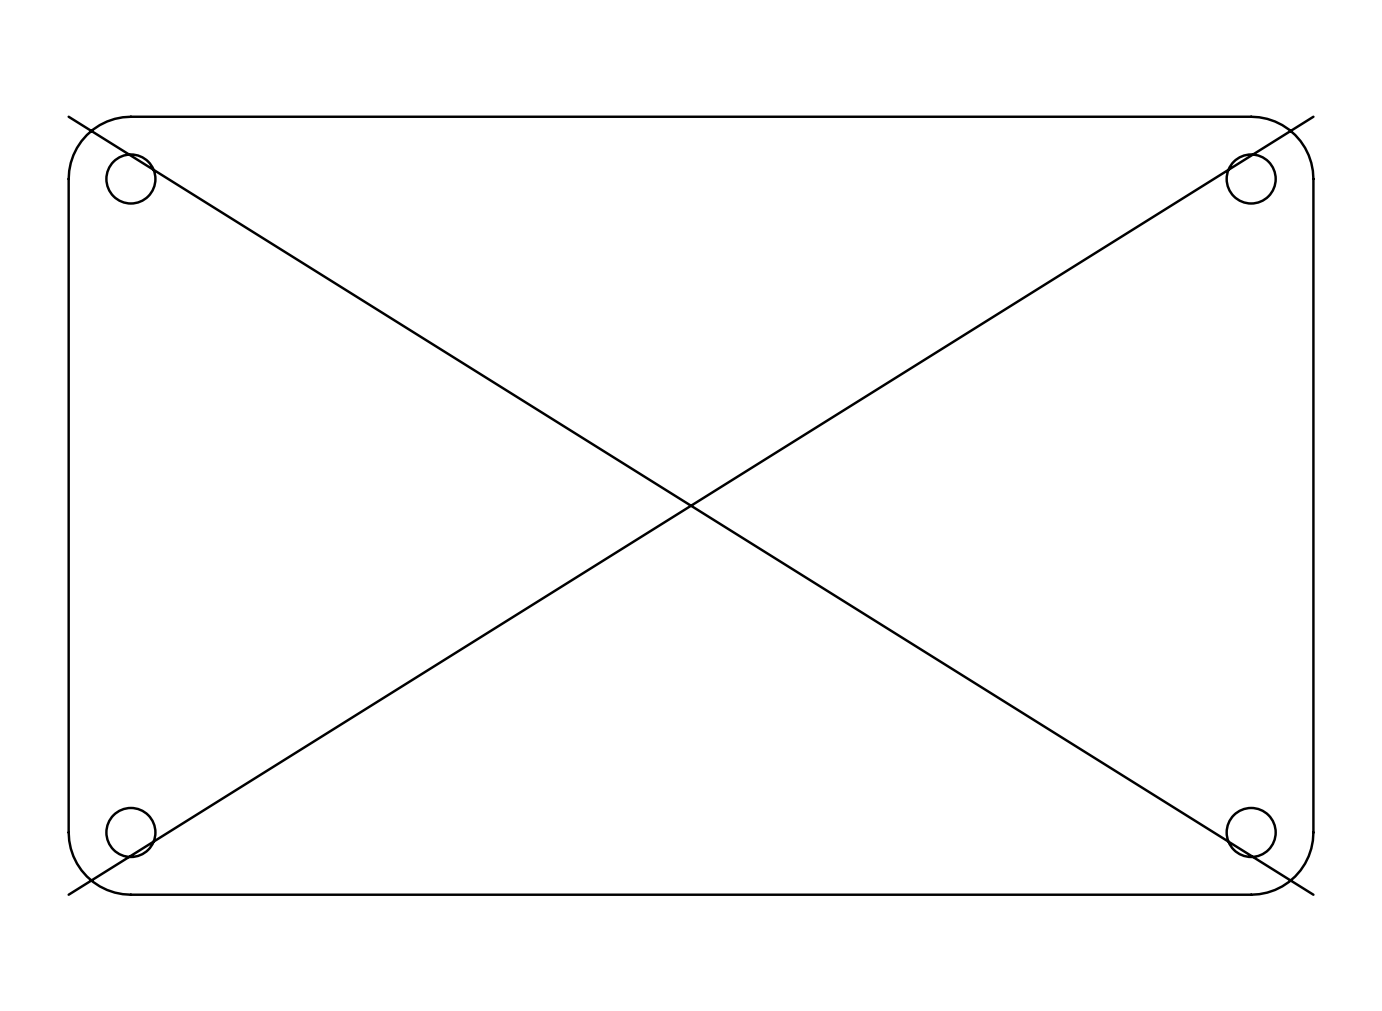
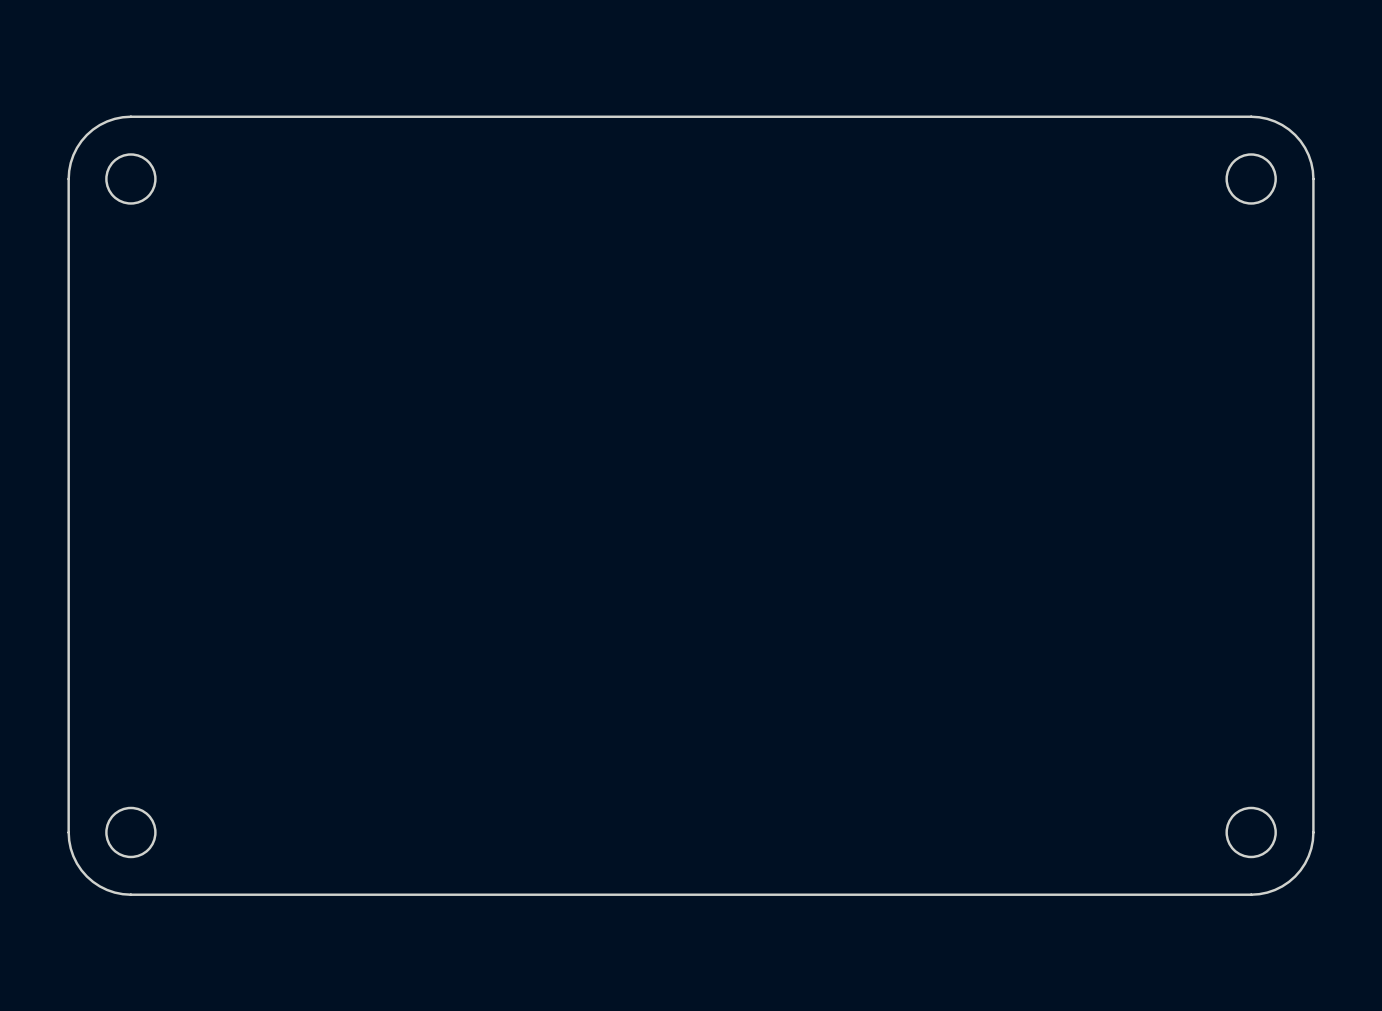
board edge: (68, 116) (1313, 894) -> none
board edge: (1313, 116) (68, 894) -> none

